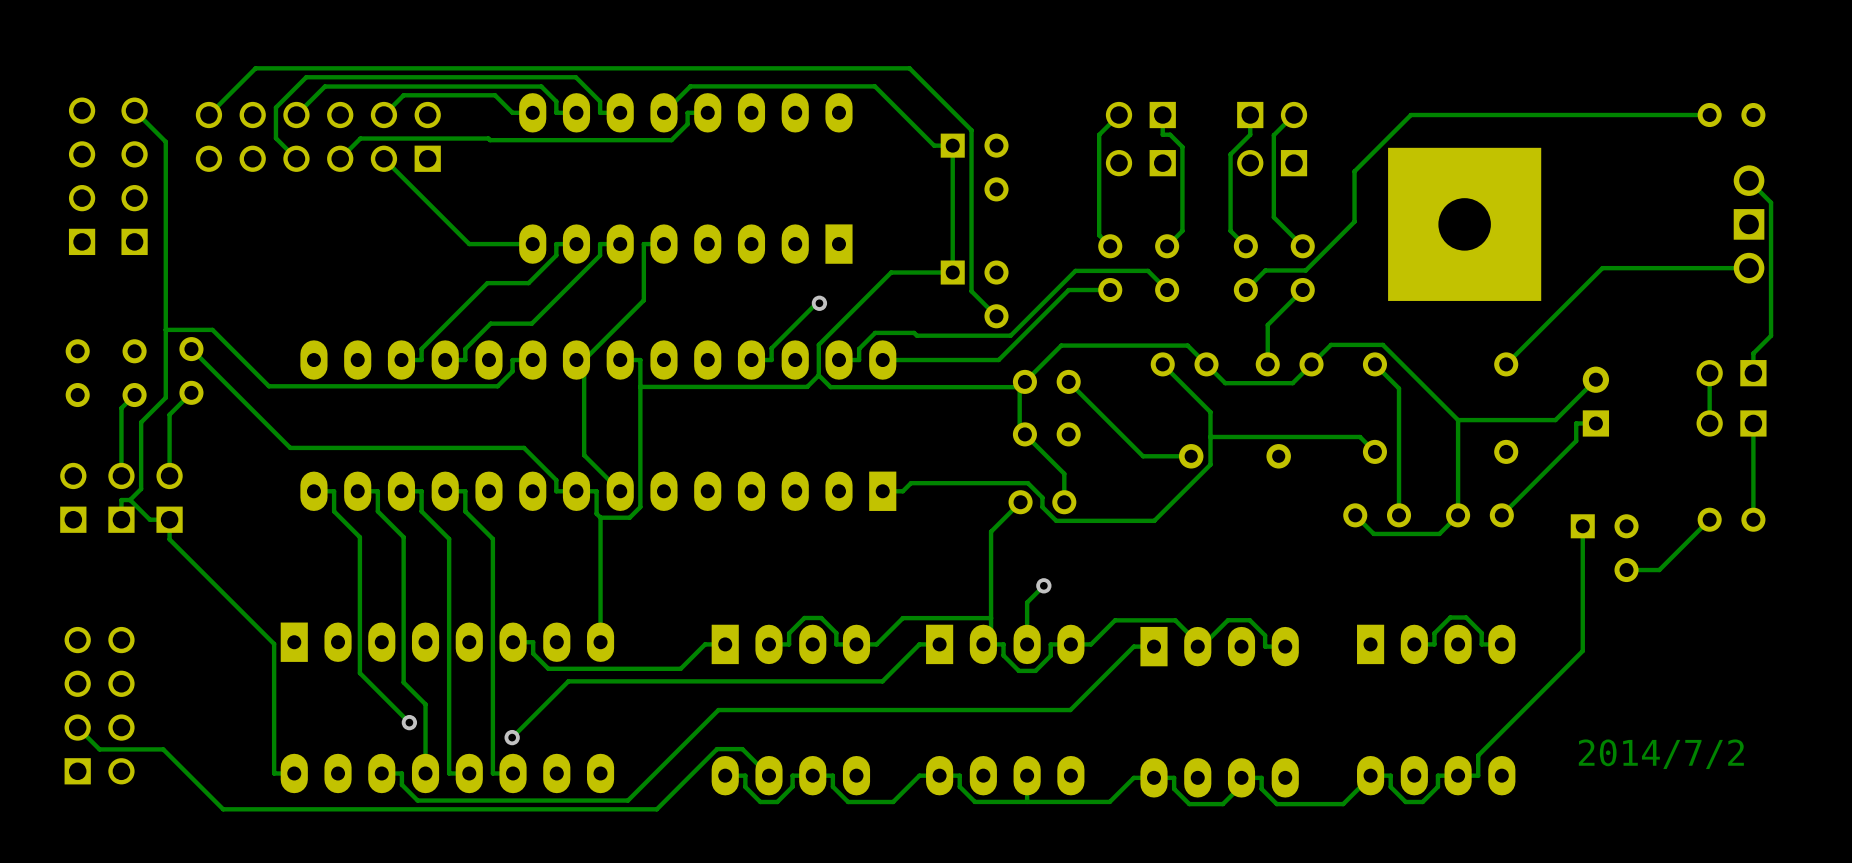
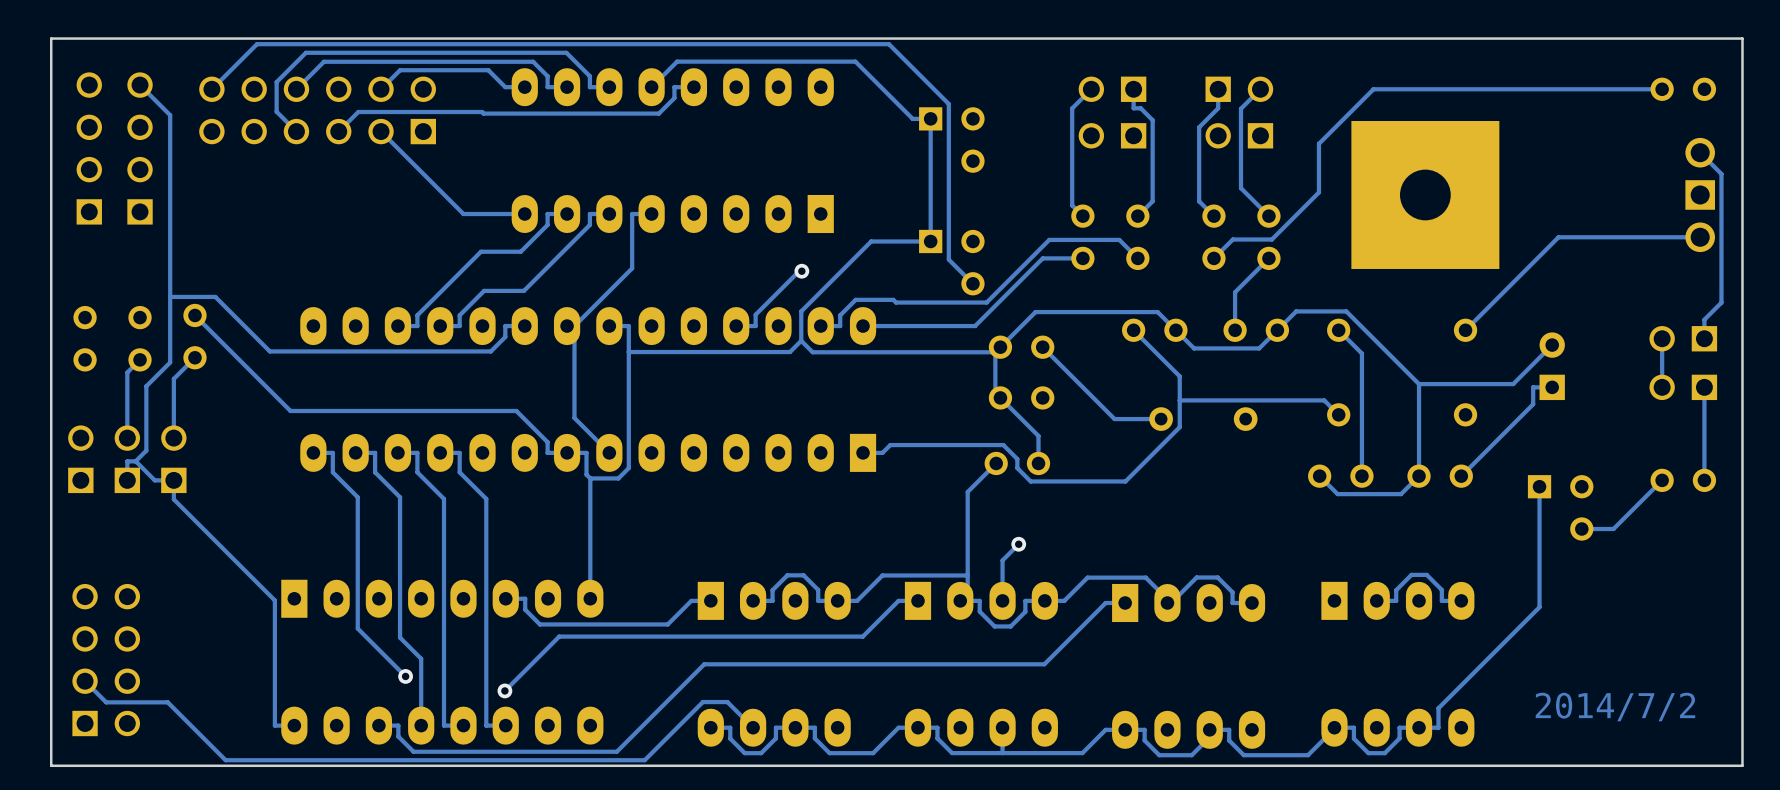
board edge: none -> (1742, 38) (1742, 765) (51, 765) (51, 38) (1742, 38)

